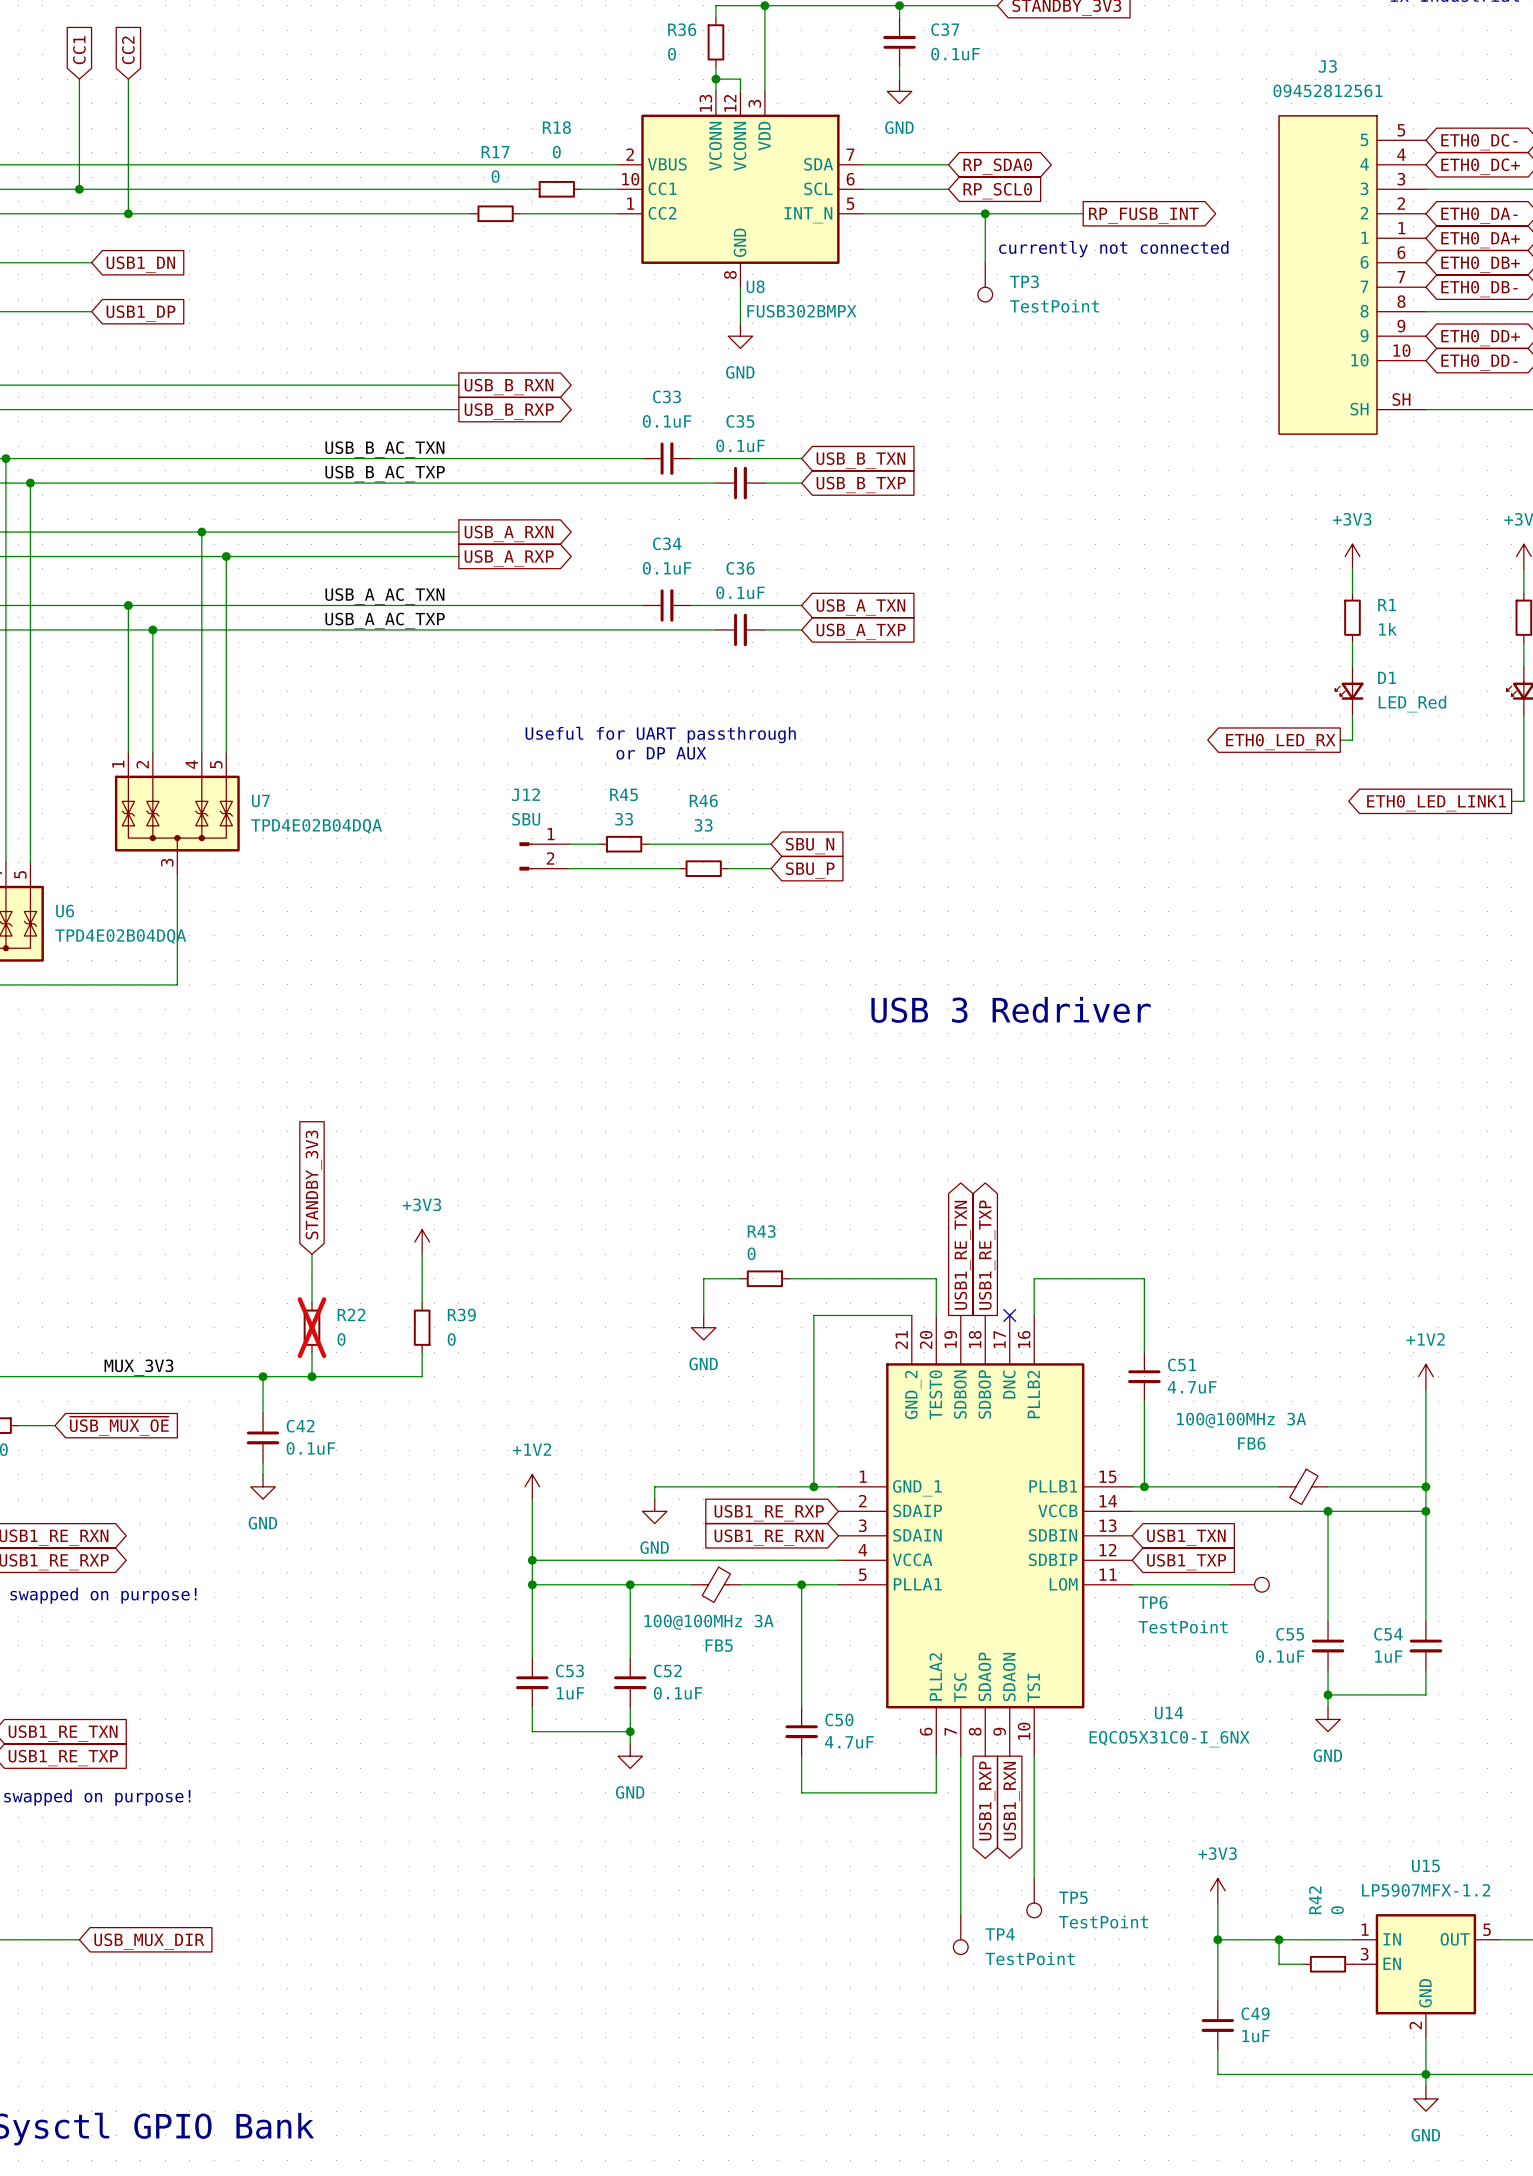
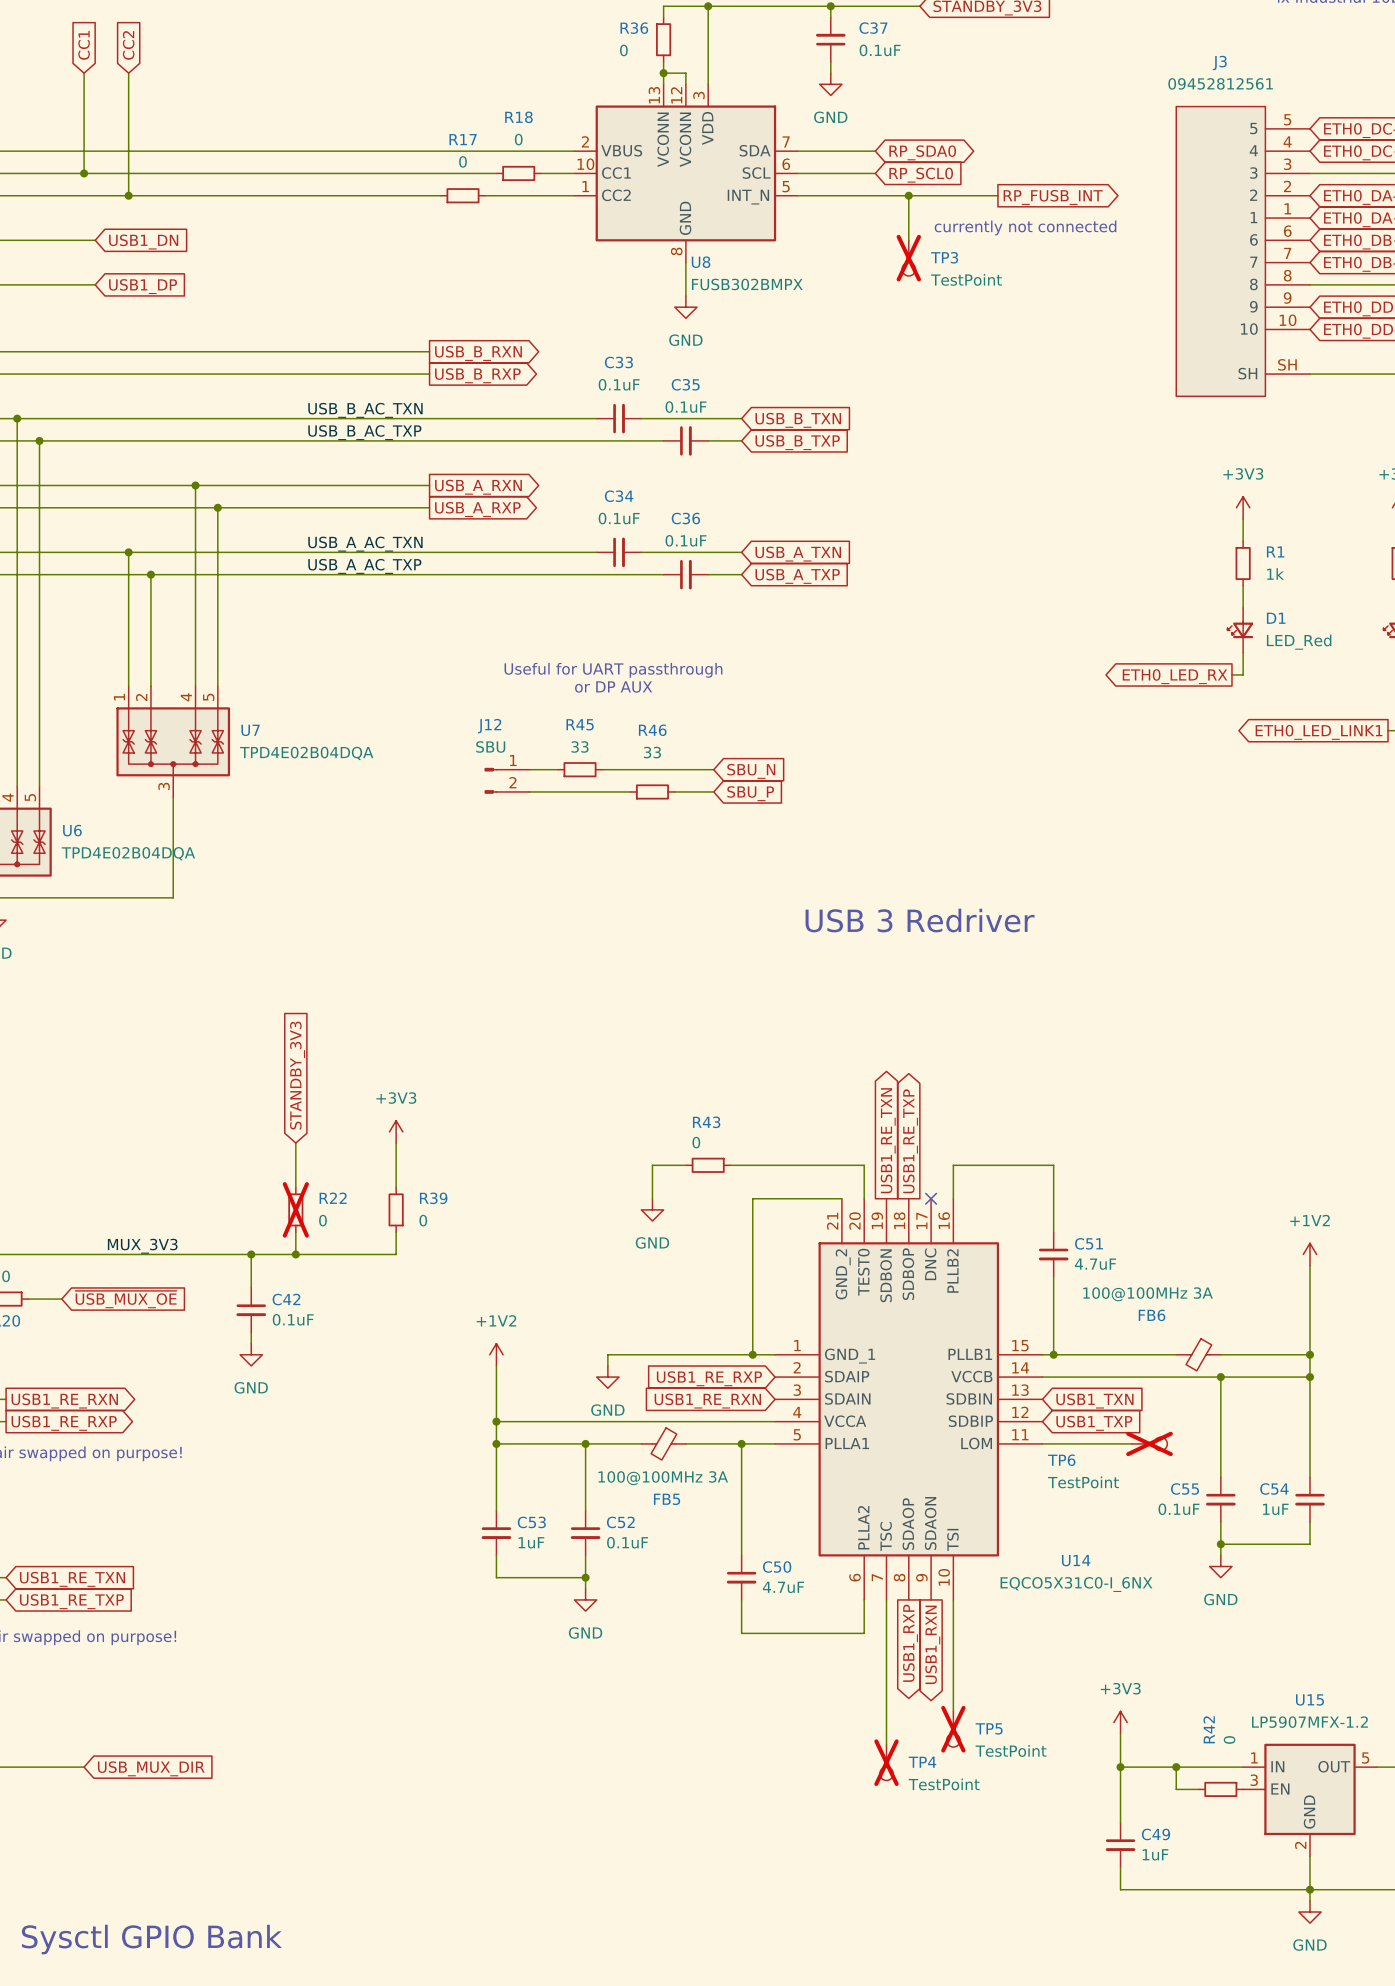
TP3 do-not-place cross: none -> (908, 258)
TP6 do-not-place cross: none -> (1149, 1443)
TP5 do-not-place cross: none -> (953, 1729)
TP4 do-not-place cross: none -> (886, 1762)

